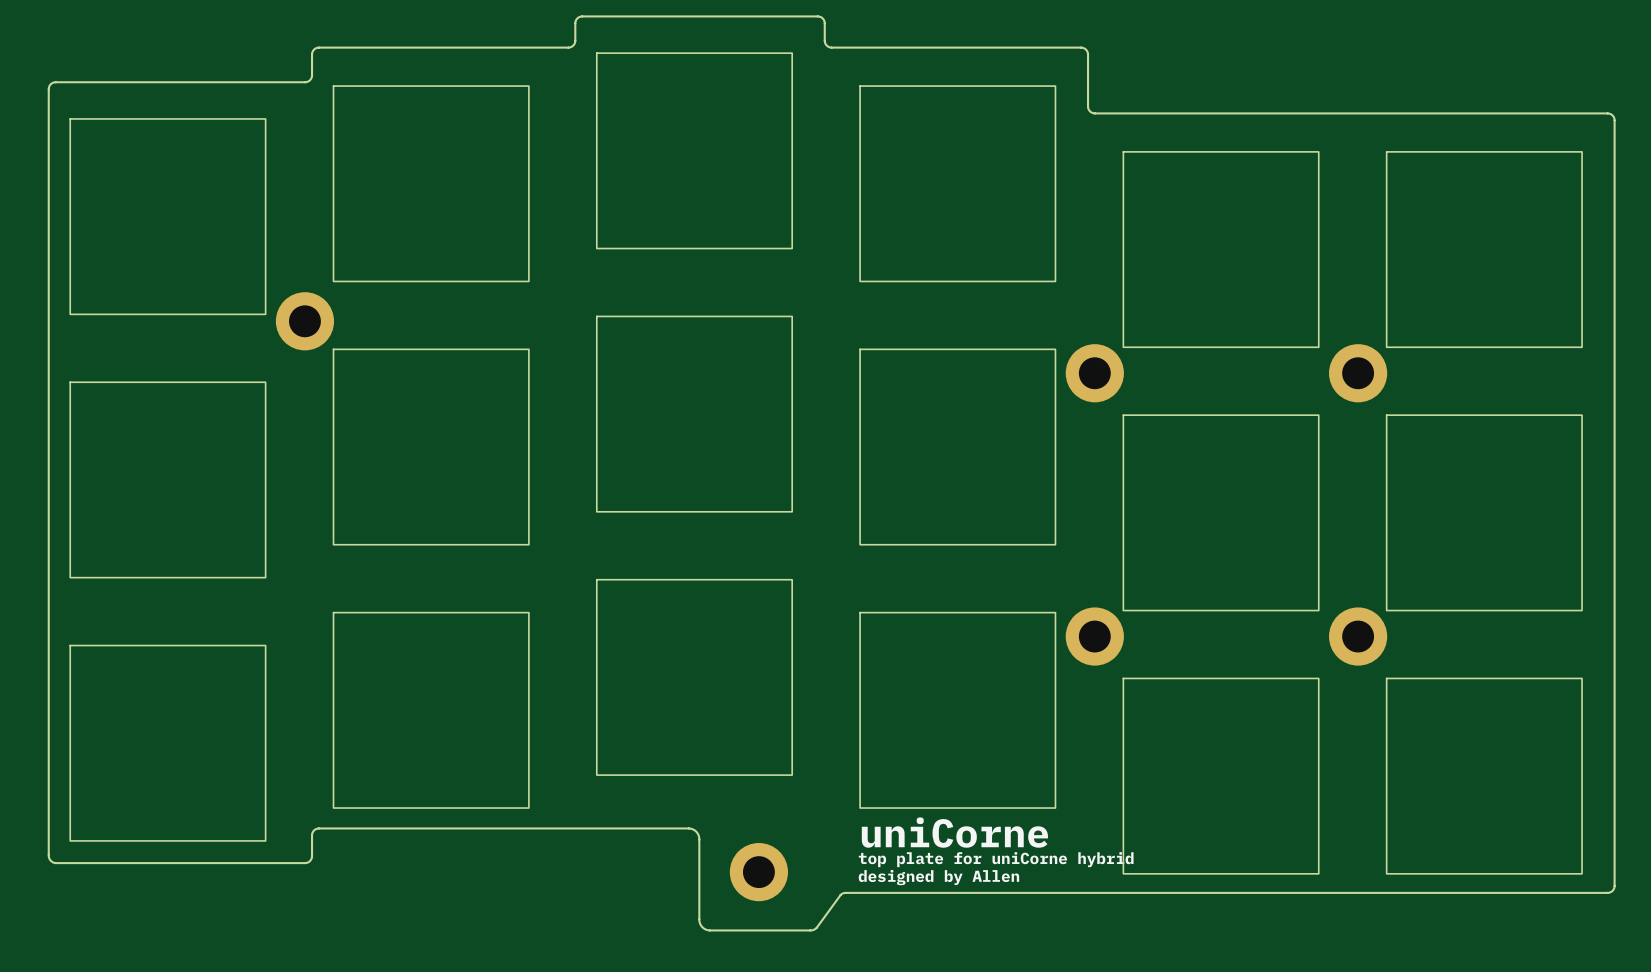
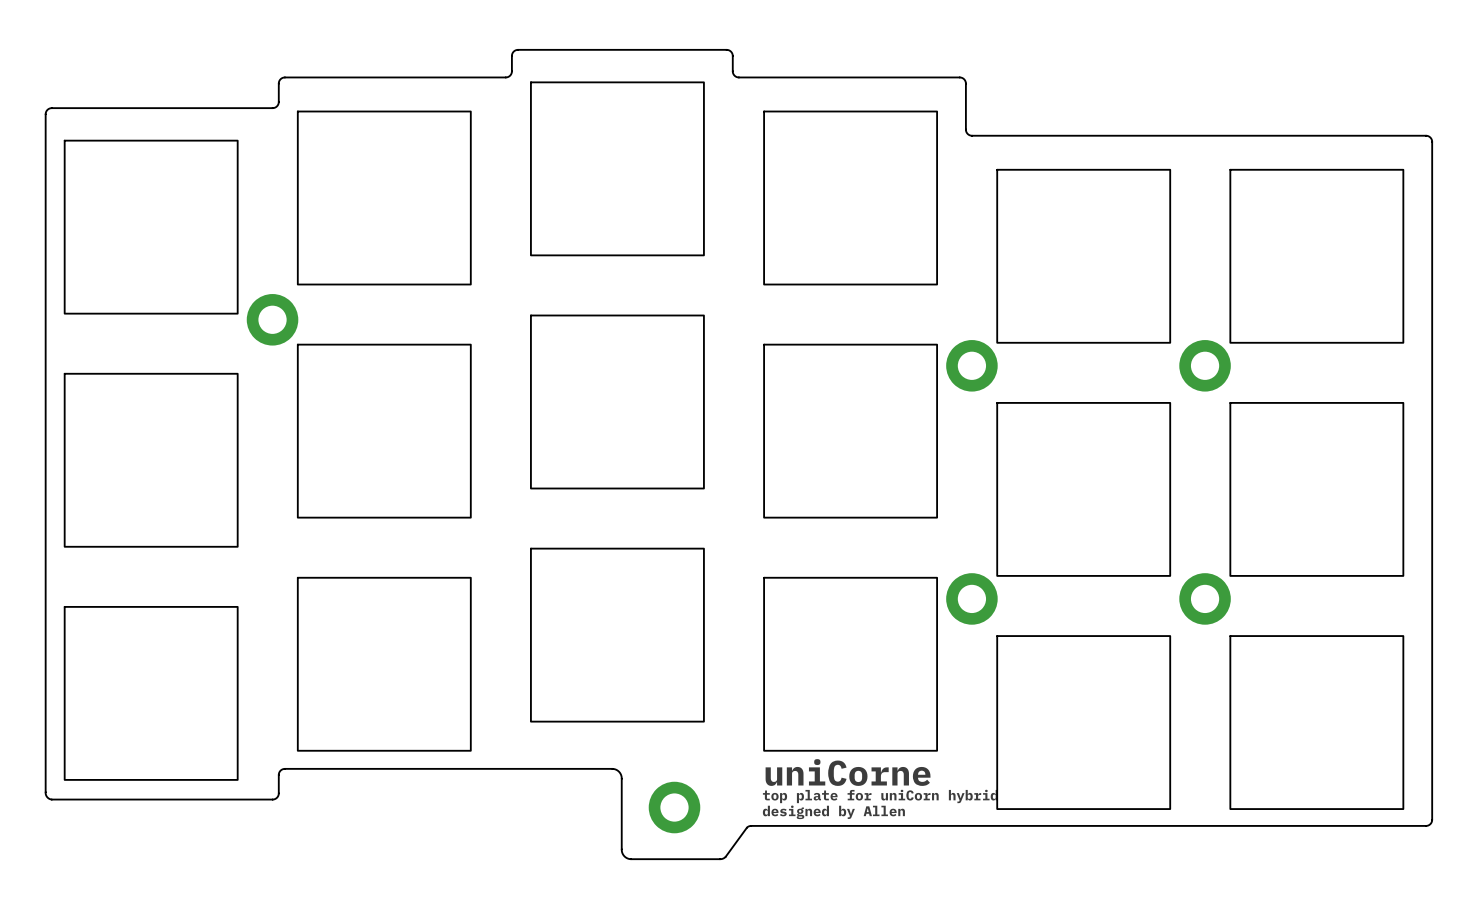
text: top plate for uniCorne hybrid (996, 859) -> top plate for uniCorn hybrid (880, 796)

